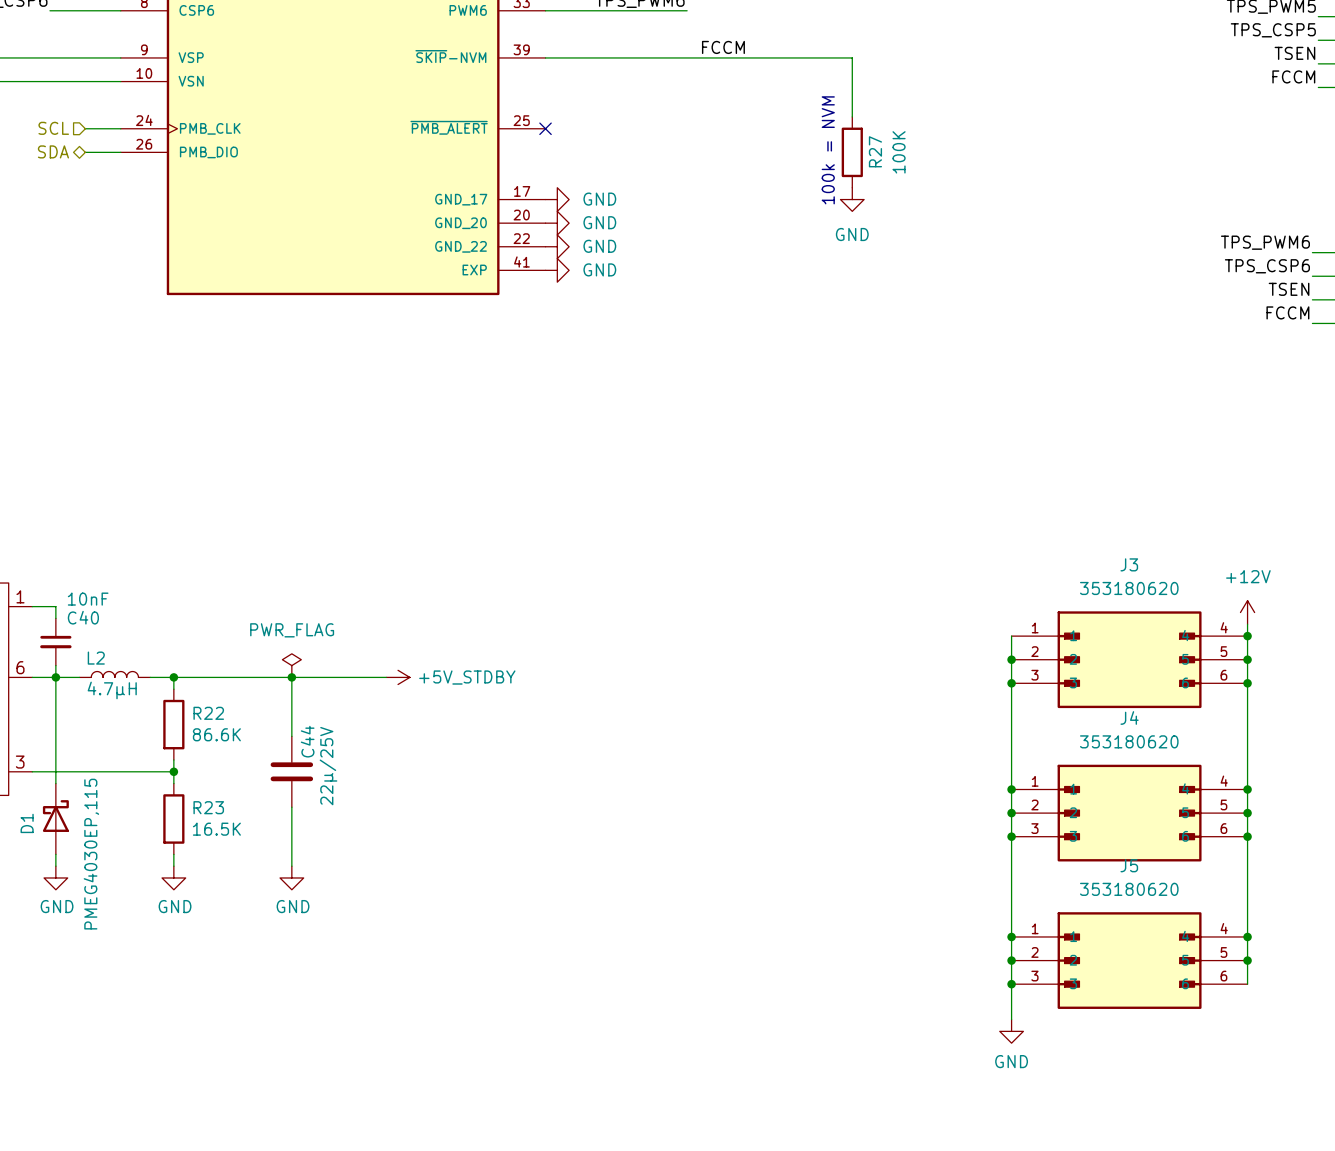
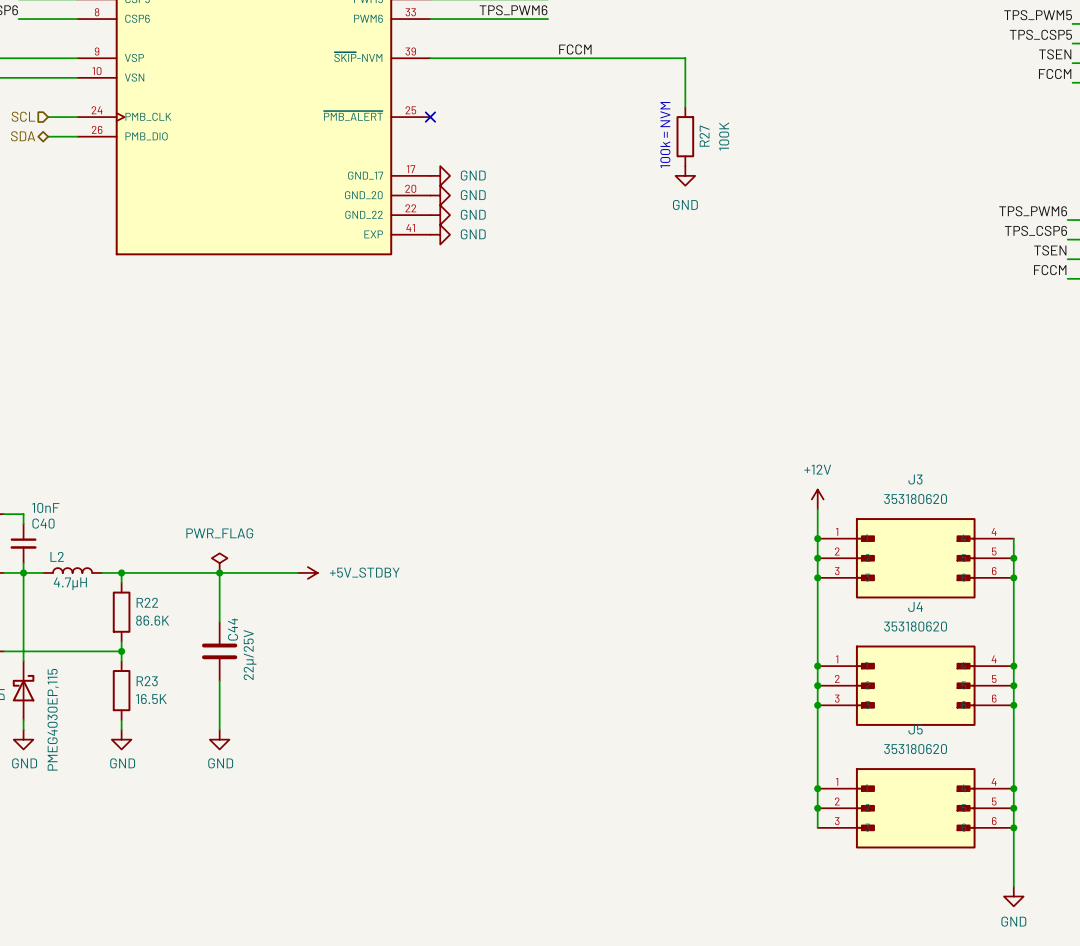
power symbol: none -> +12V (817, 499)
wire: none -> (817, 509) (817, 538)
power symbol: +12V (1247, 612) -> none
wire: (1247, 624) (1247, 636) -> none
junction: none -> (817, 538)
junction: (1247, 636) -> none
wire: (1011, 984) (1011, 1019) -> none
junction: (1011, 984) -> none
wire: none -> (1013, 827) (1013, 886)
junction: none -> (1013, 827)
power symbol: GND (1011, 1031) -> none
power symbol: none -> GND (1013, 896)

